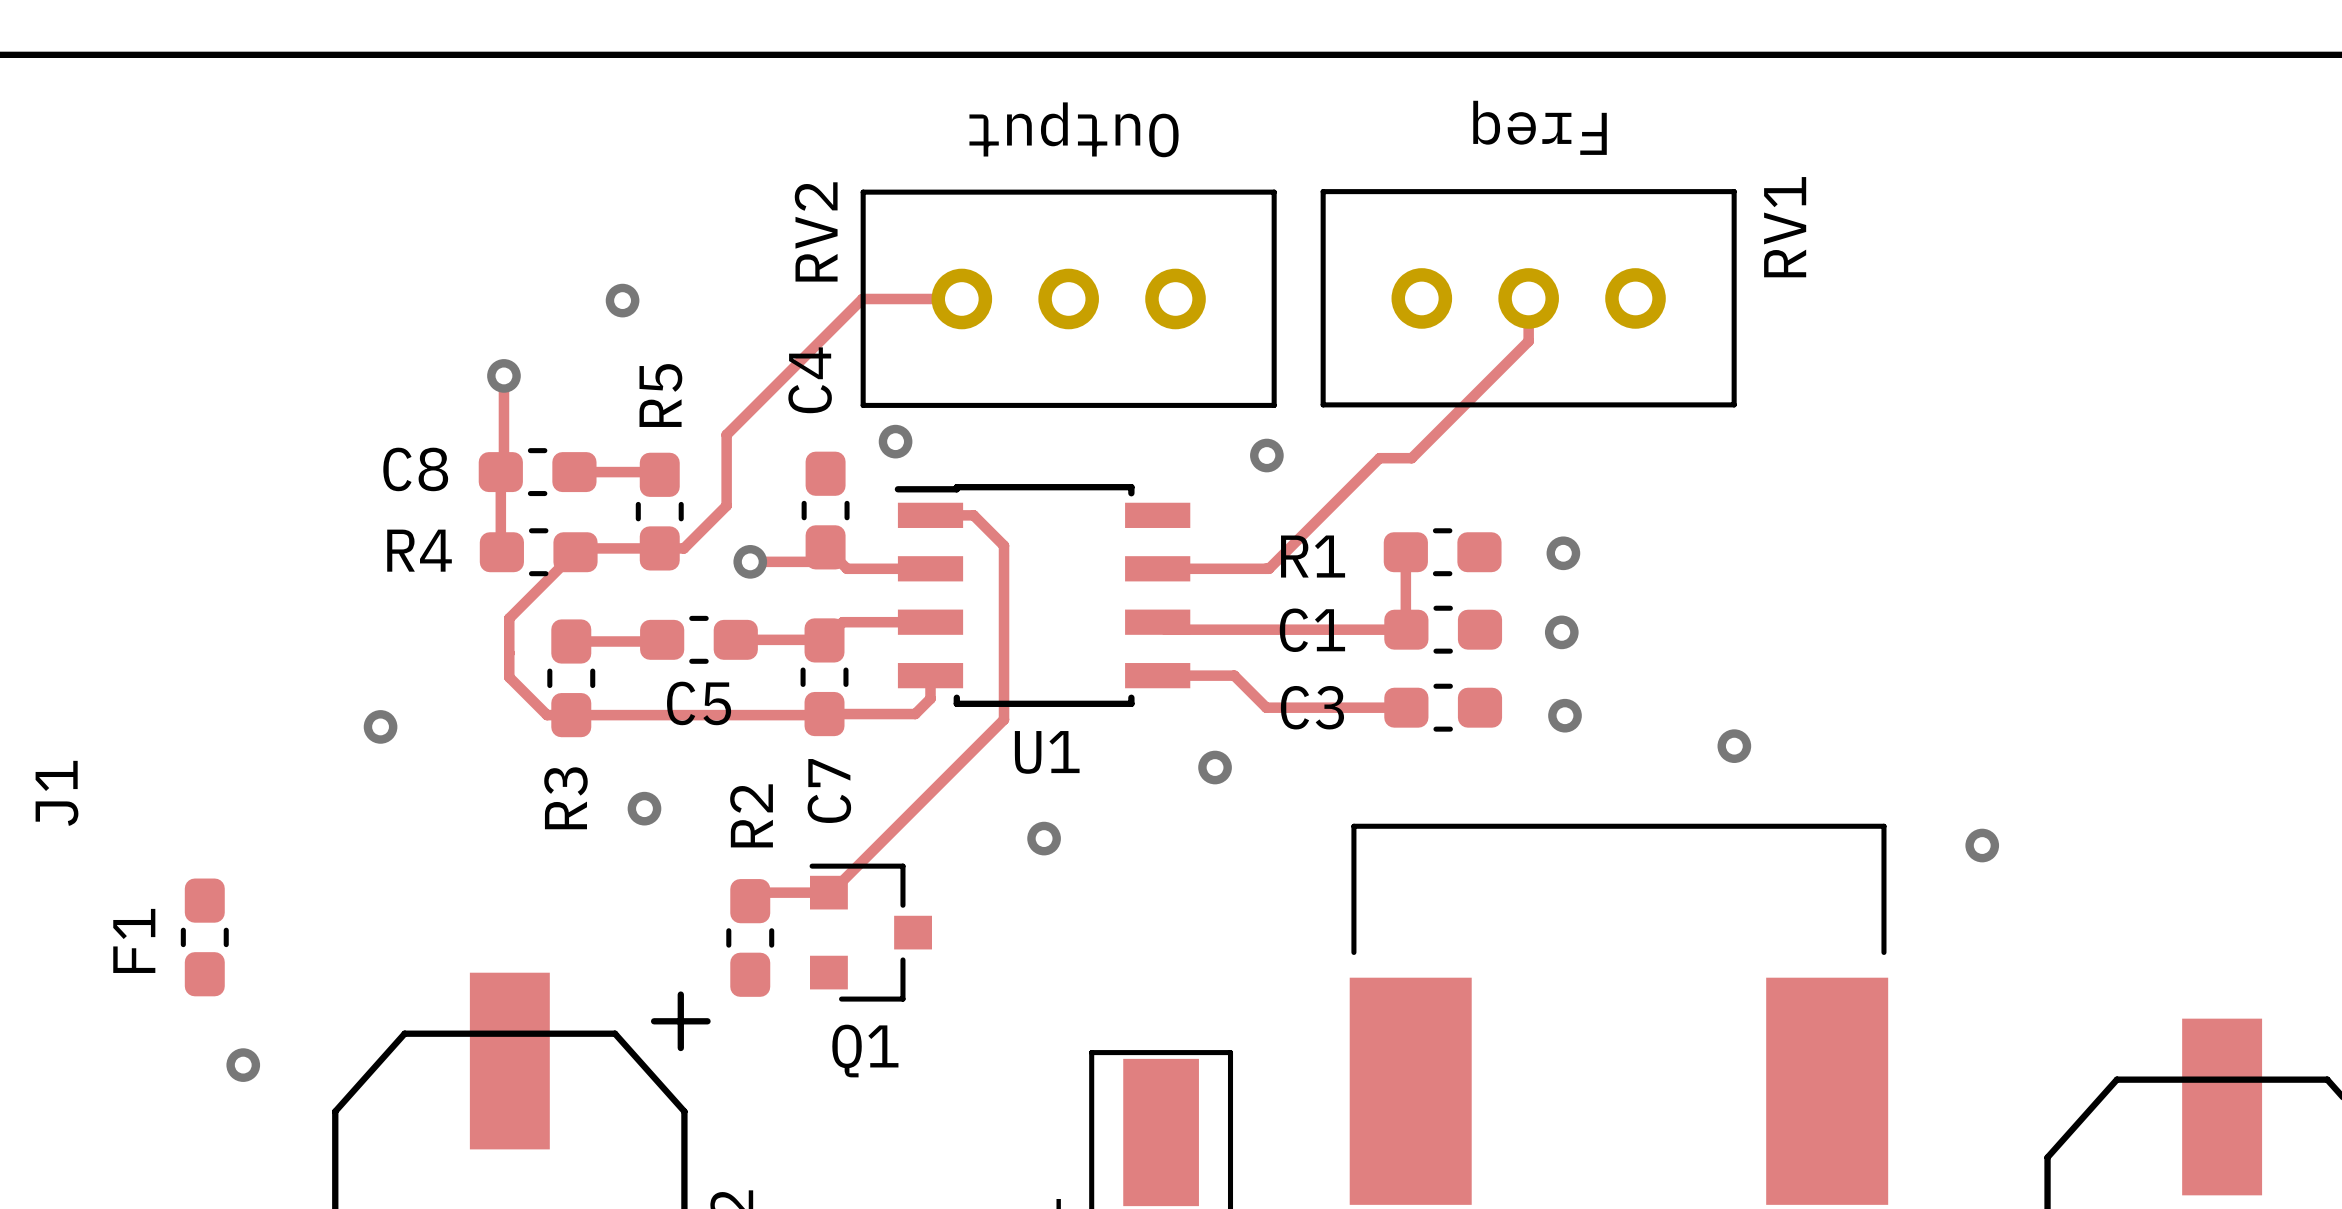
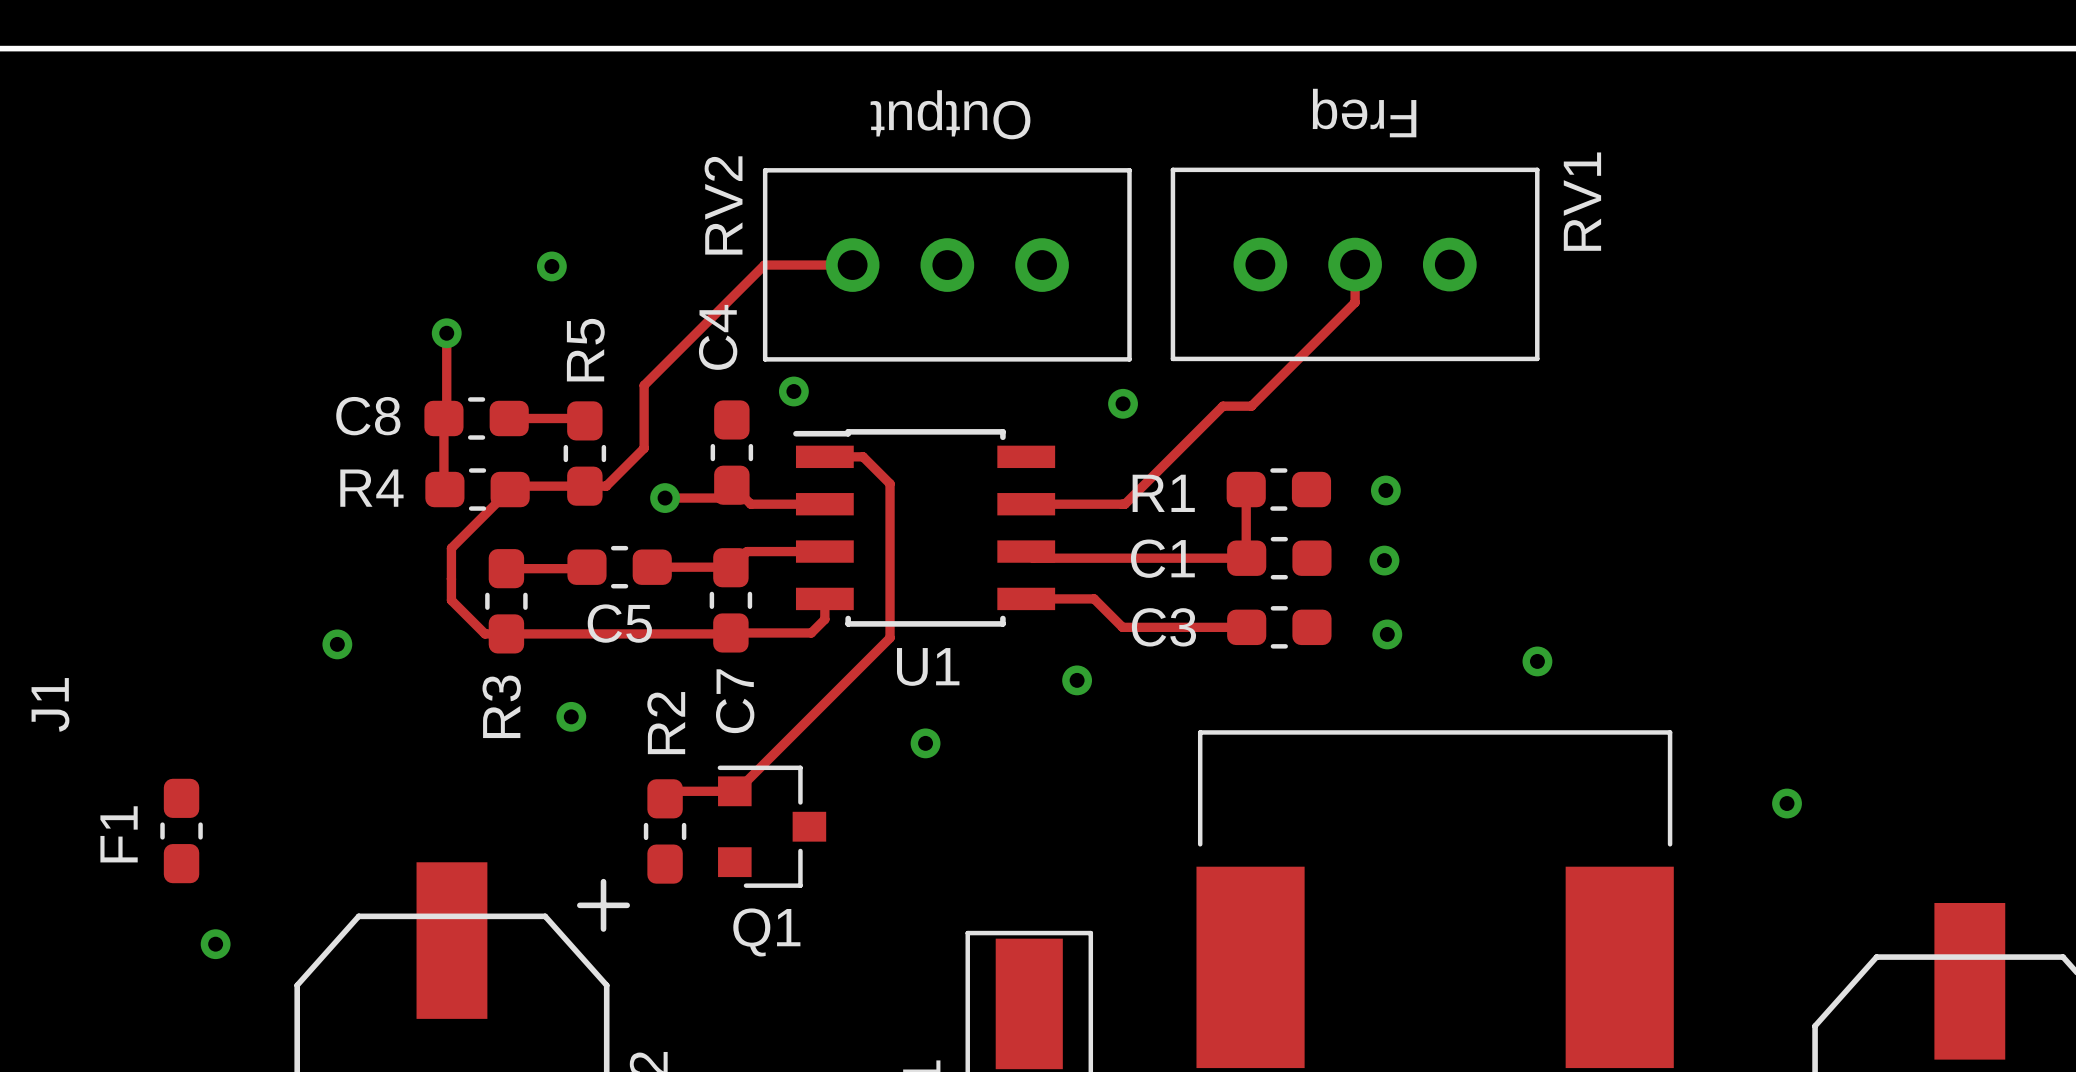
via position: (1982, 845) -> (1787, 803)

